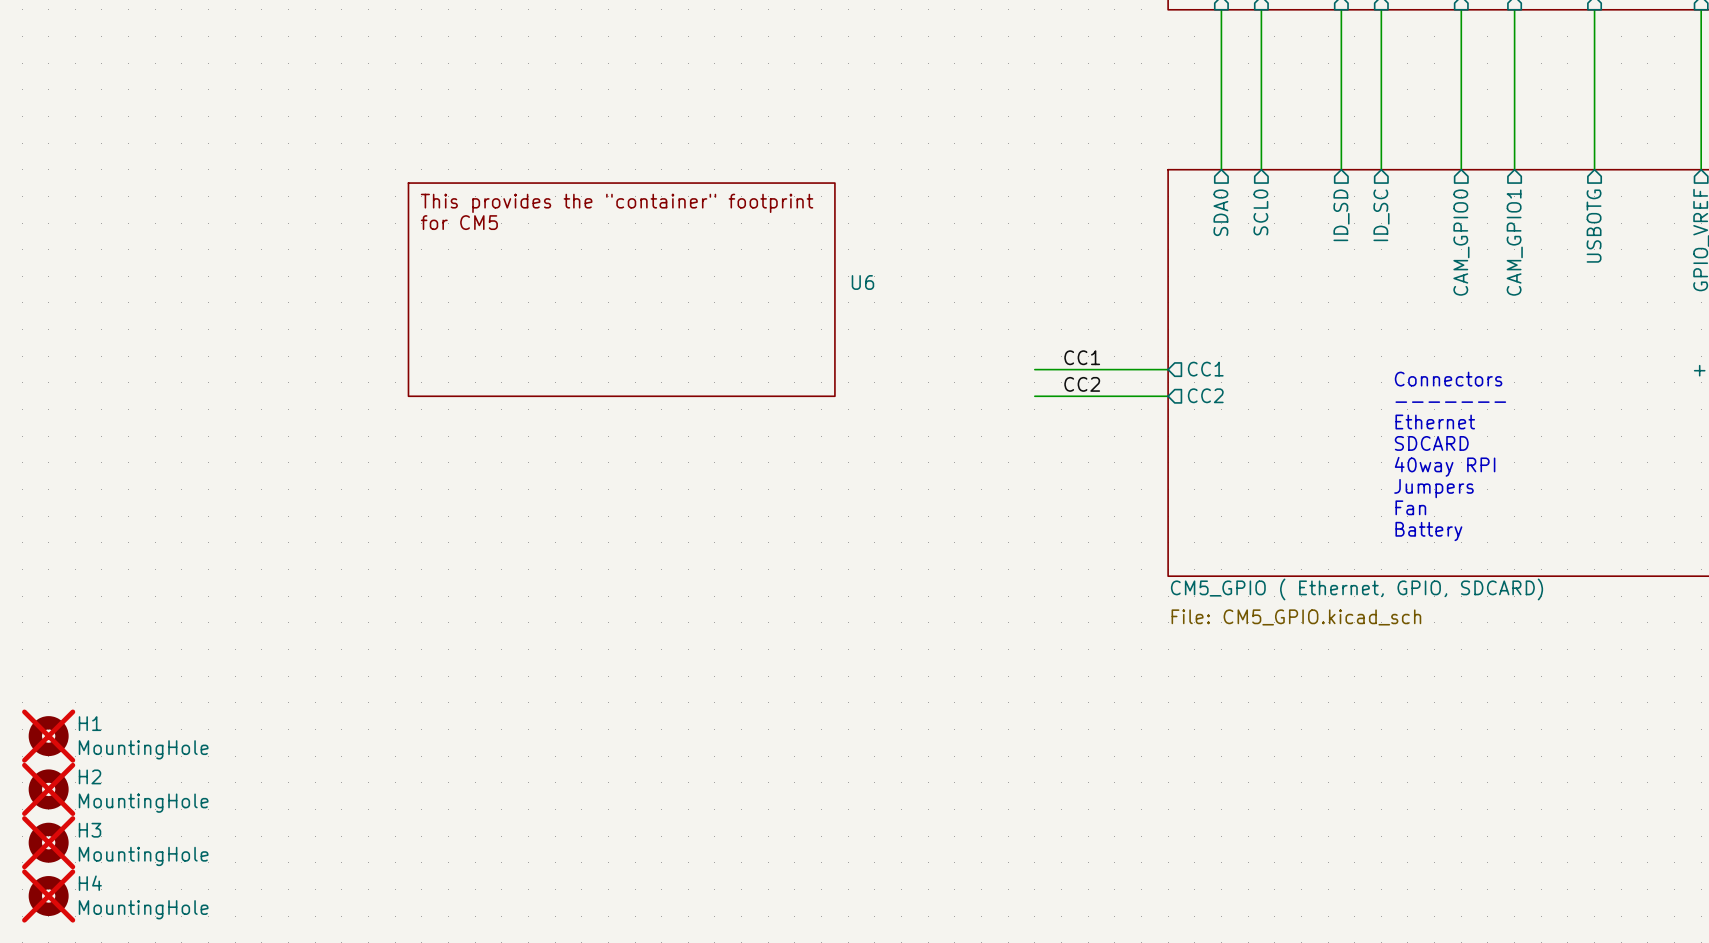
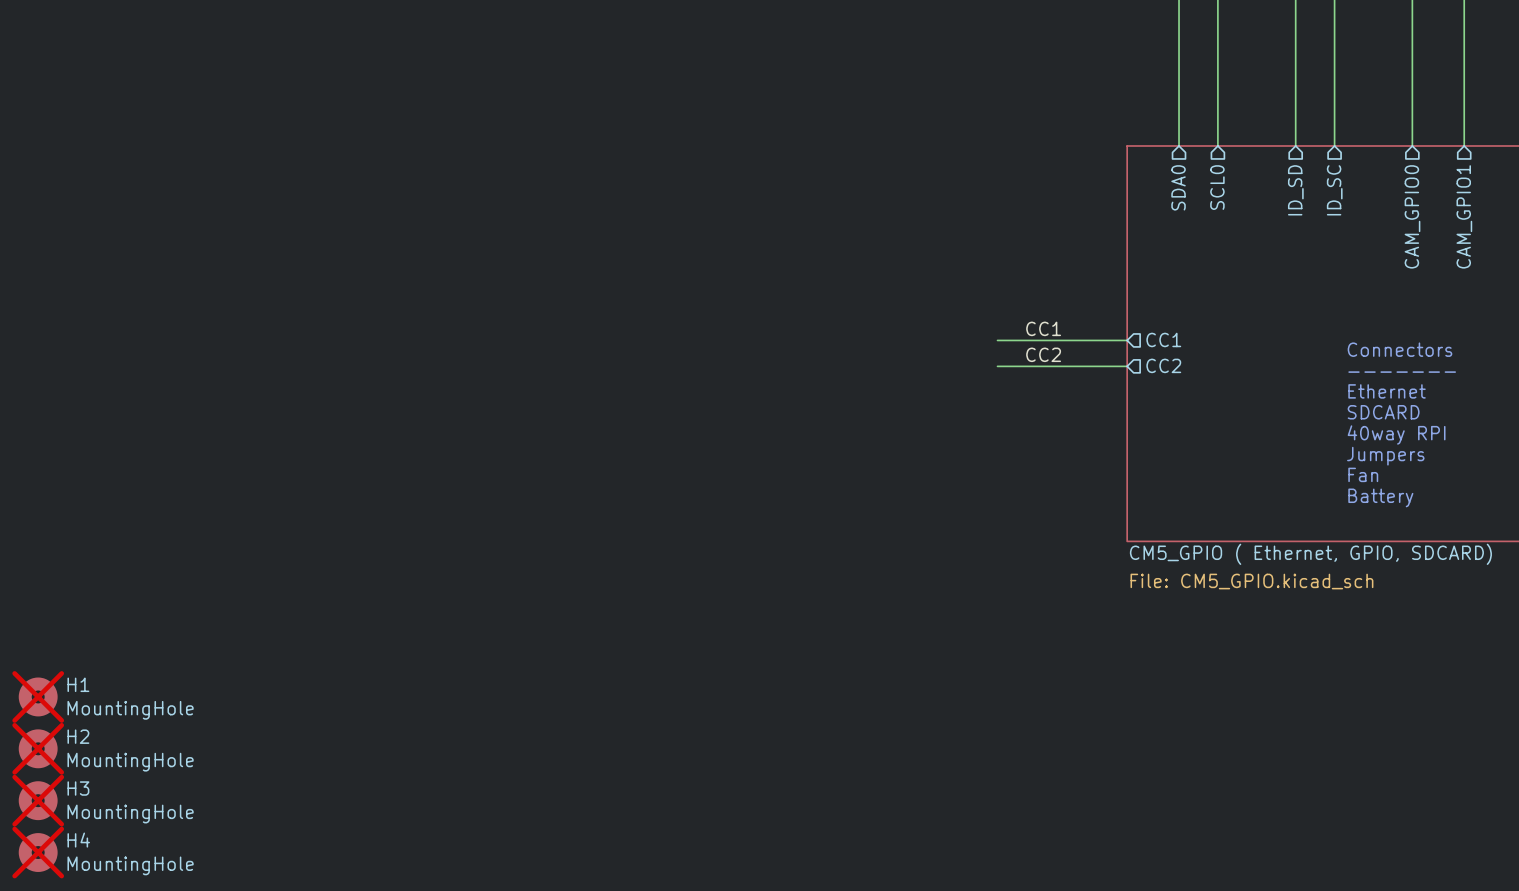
U6: (621, 289) -> none

